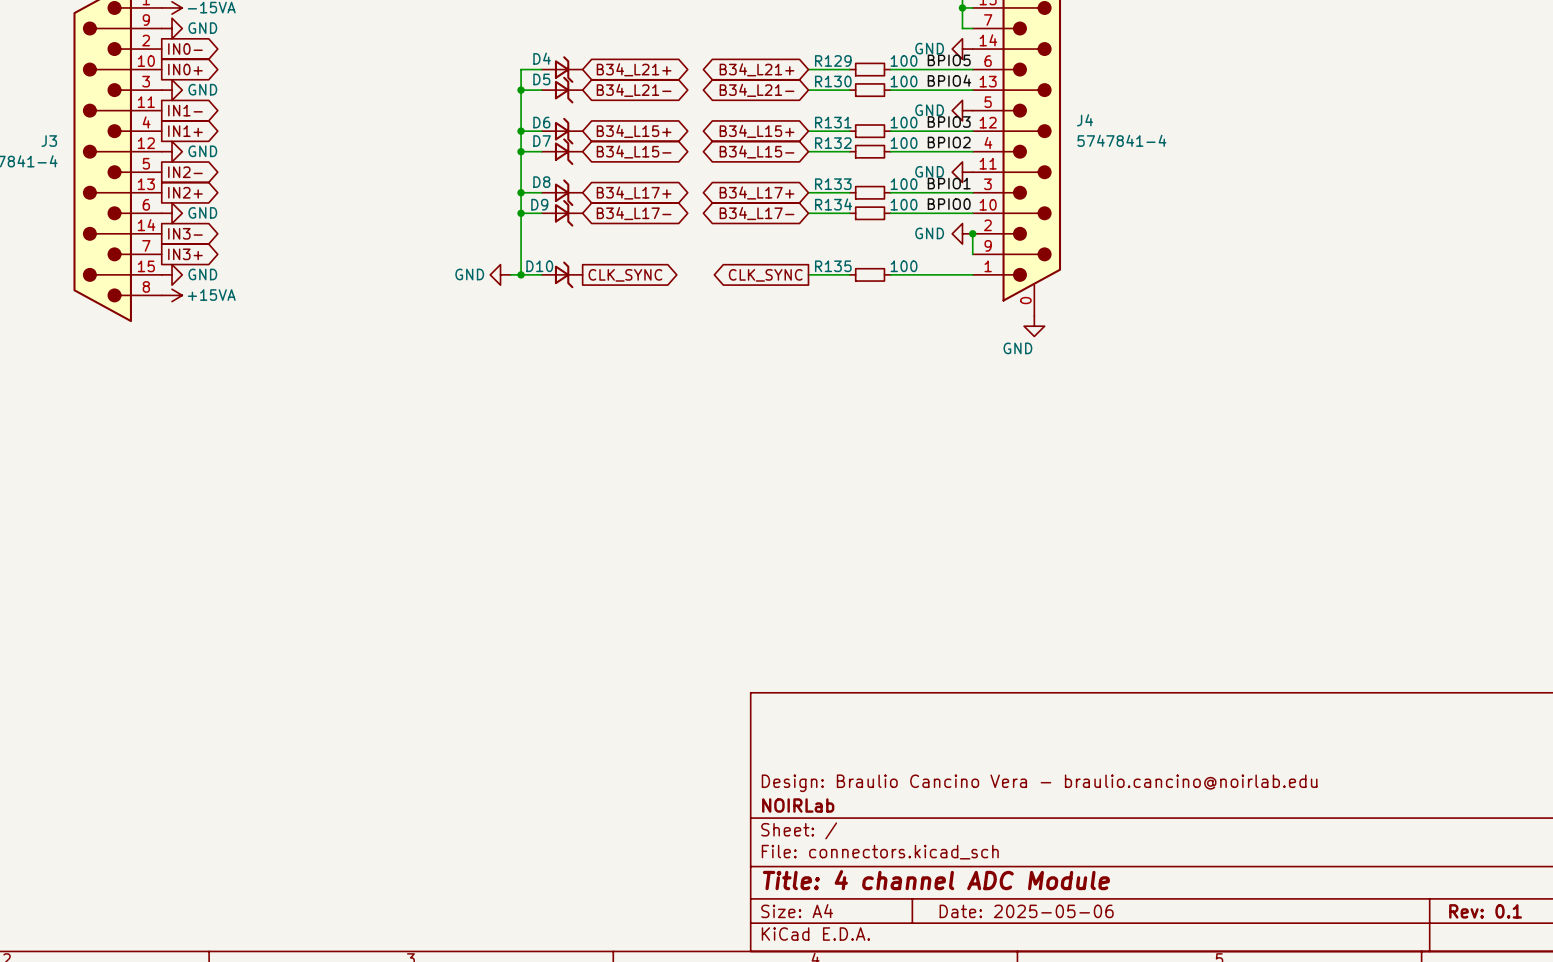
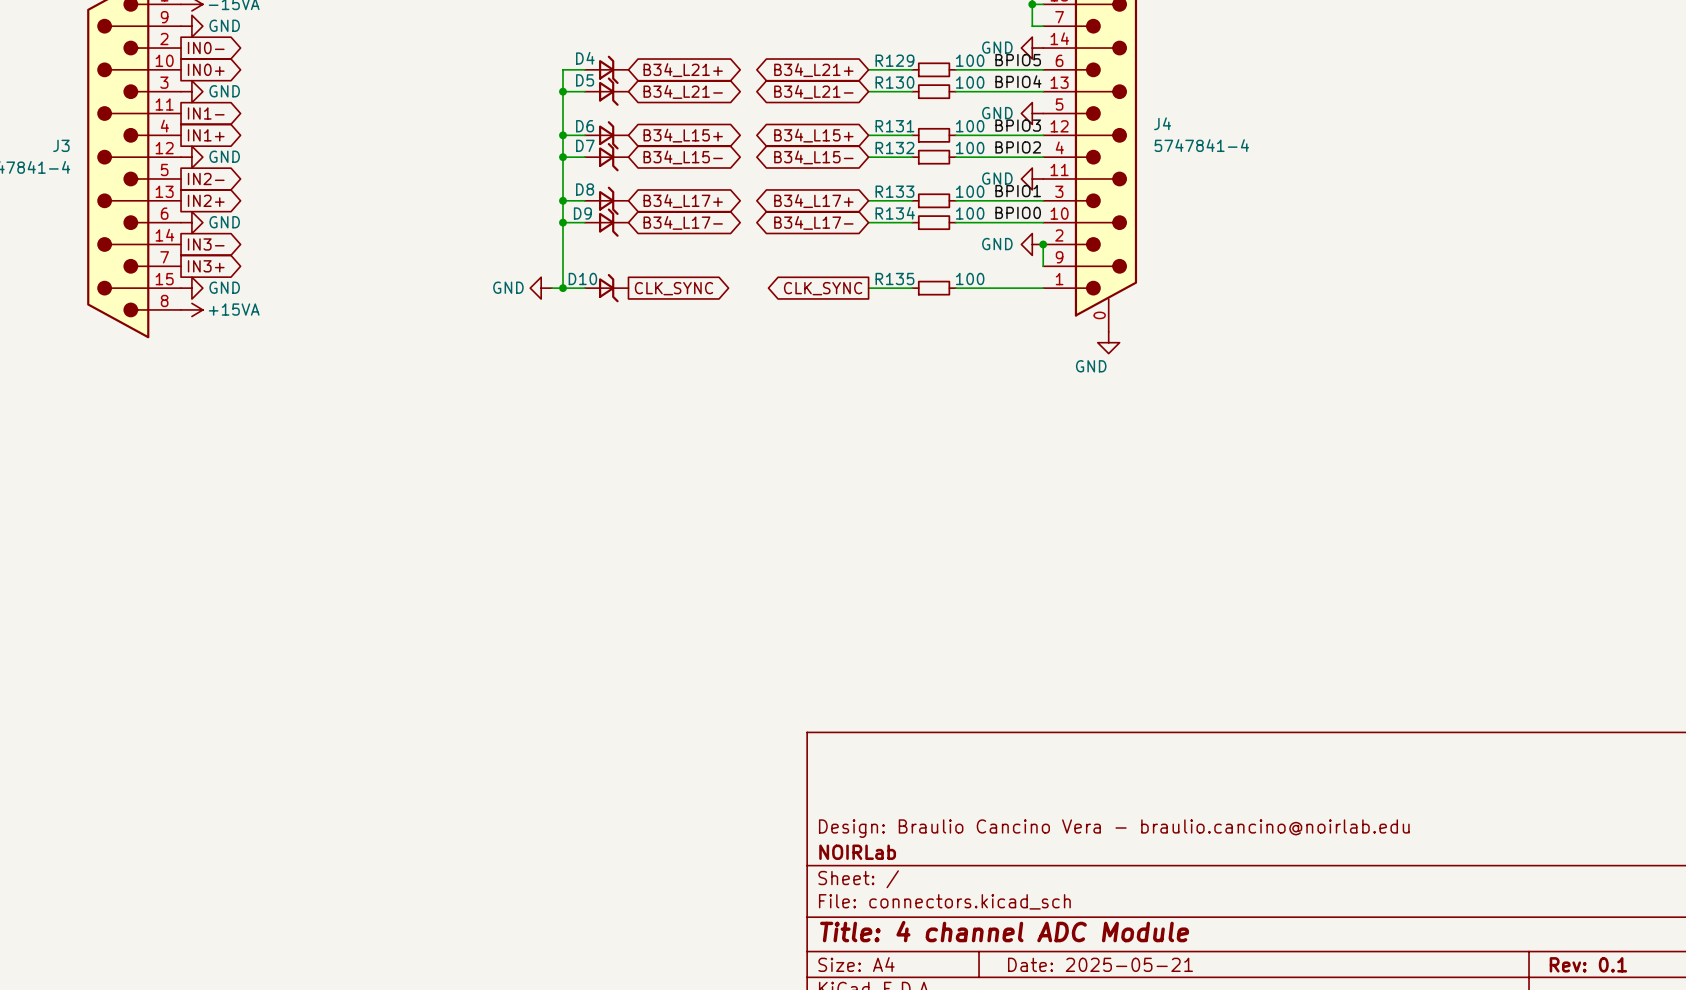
title block: Date: 2025-05-06 (1026, 911) -> Date: 2025-05-21 (1100, 964)

